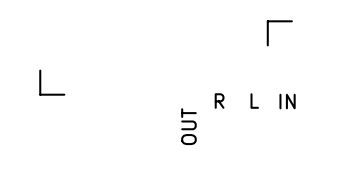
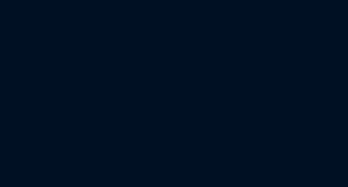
line: (291, 21) (267, 21) (267, 45) -> none
line: (40, 70) (40, 94) (64, 94) -> none
text: R (219, 101) -> none
text: L (254, 101) -> none
text: IN (287, 101) -> none
text: OUT (188, 126) -> none

